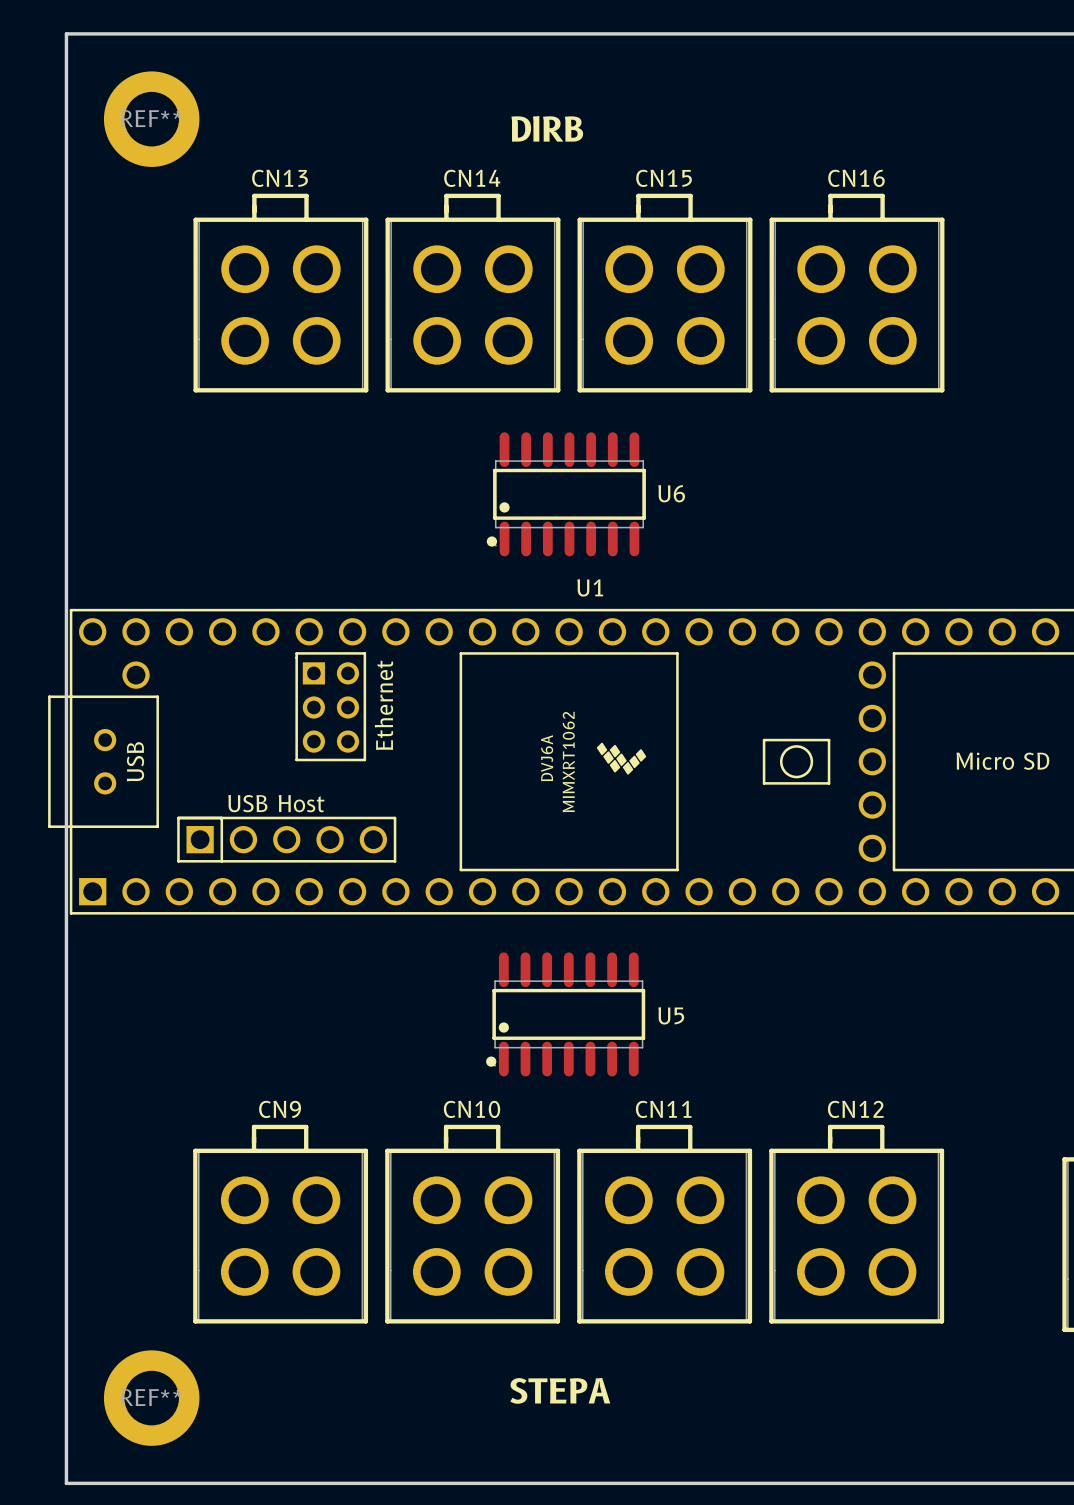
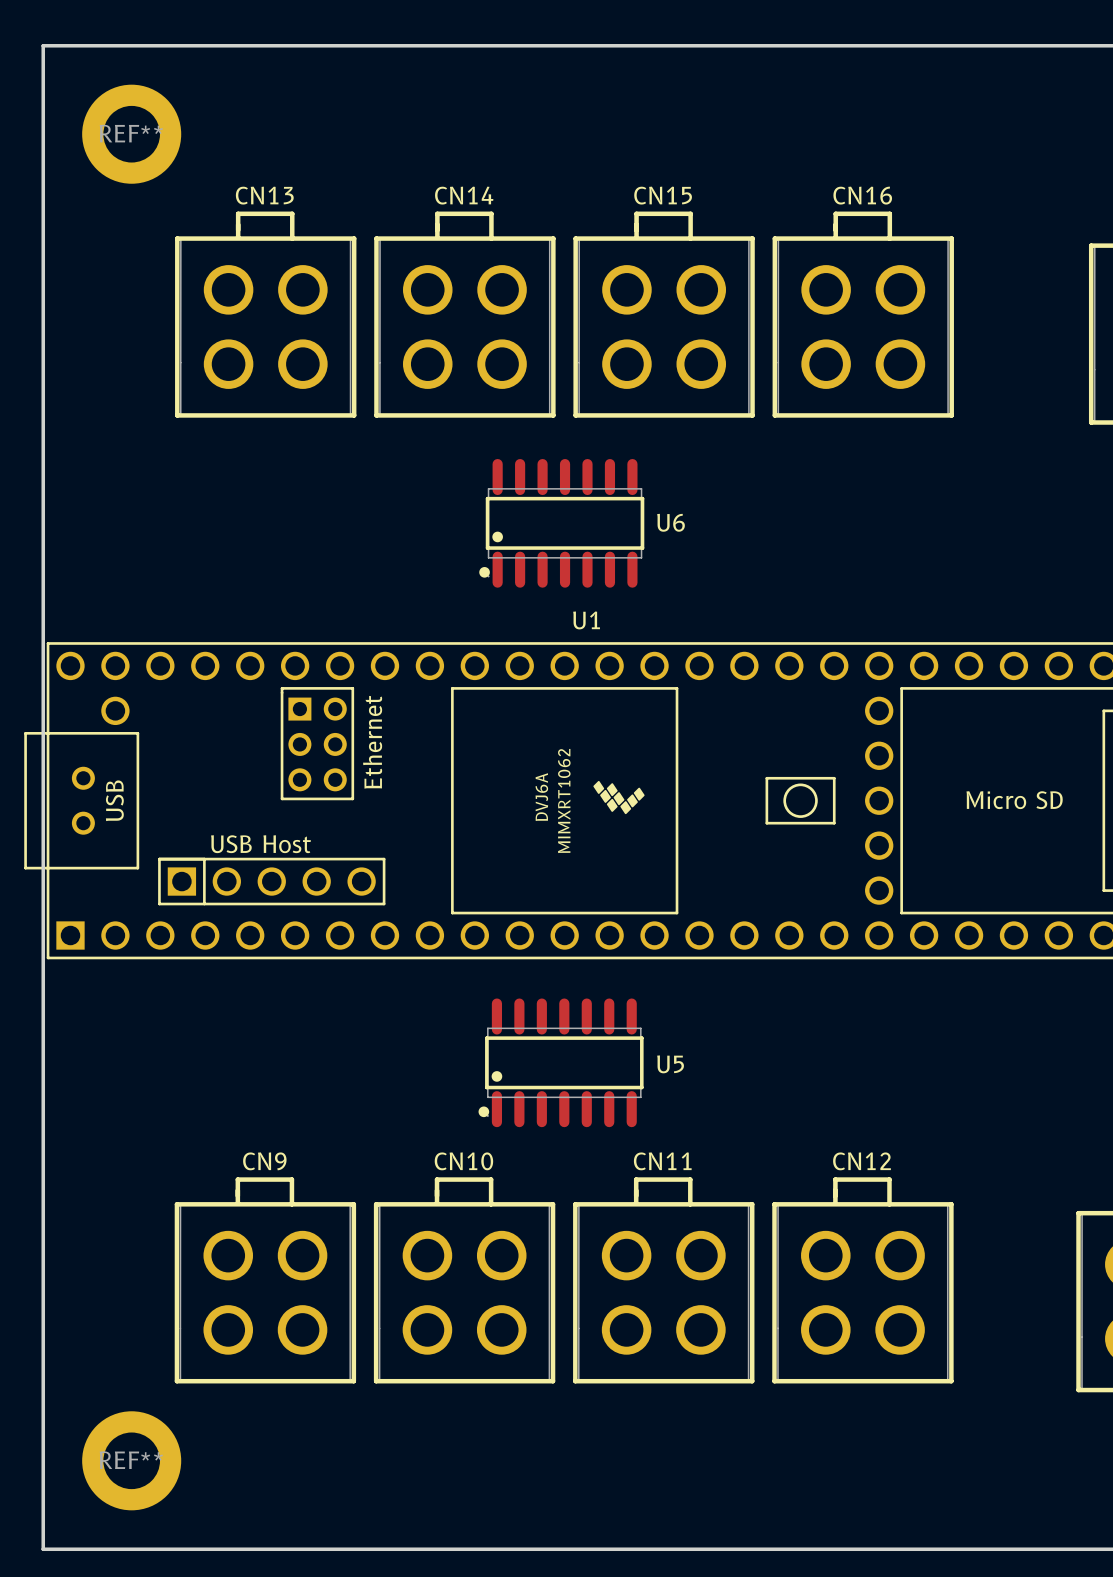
text: DIRB (547, 128) -> none
text: STEPA (560, 1390) -> none

